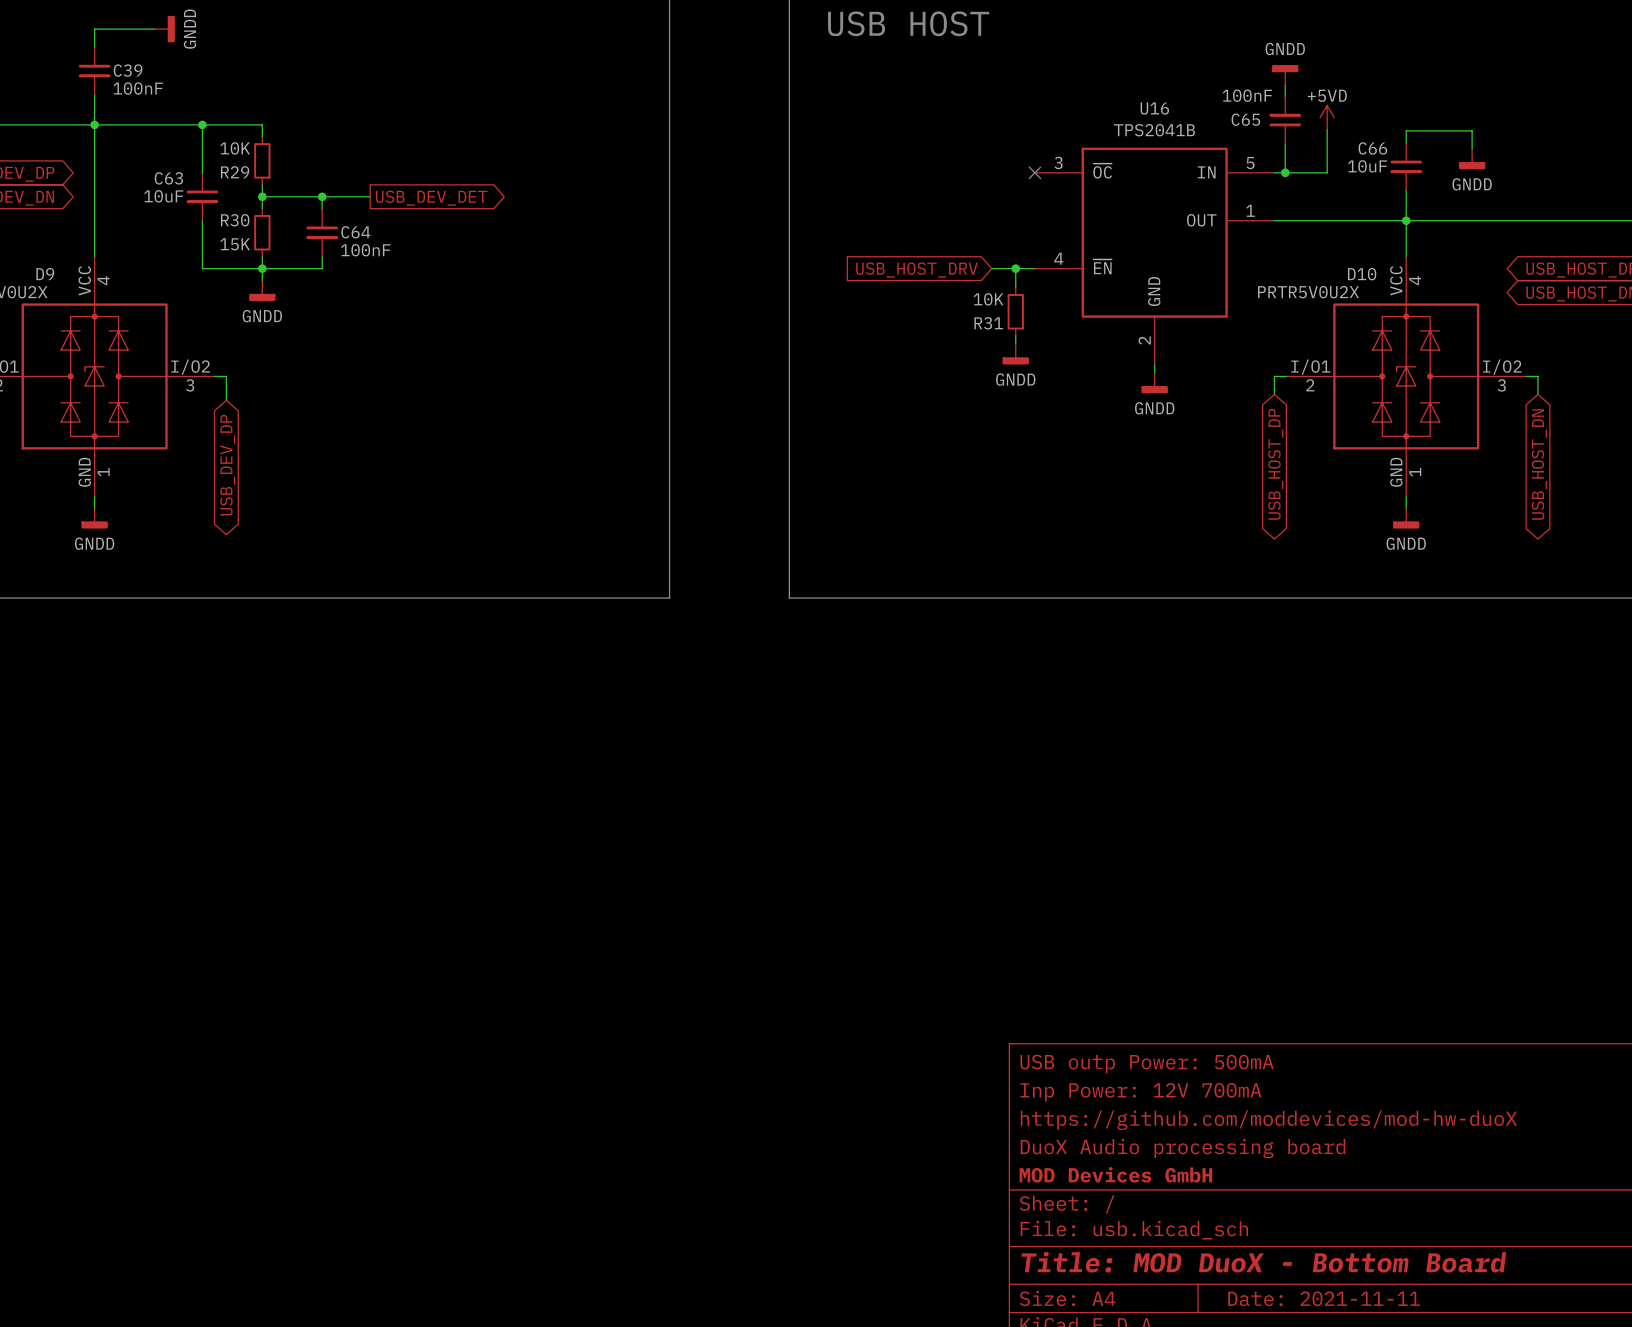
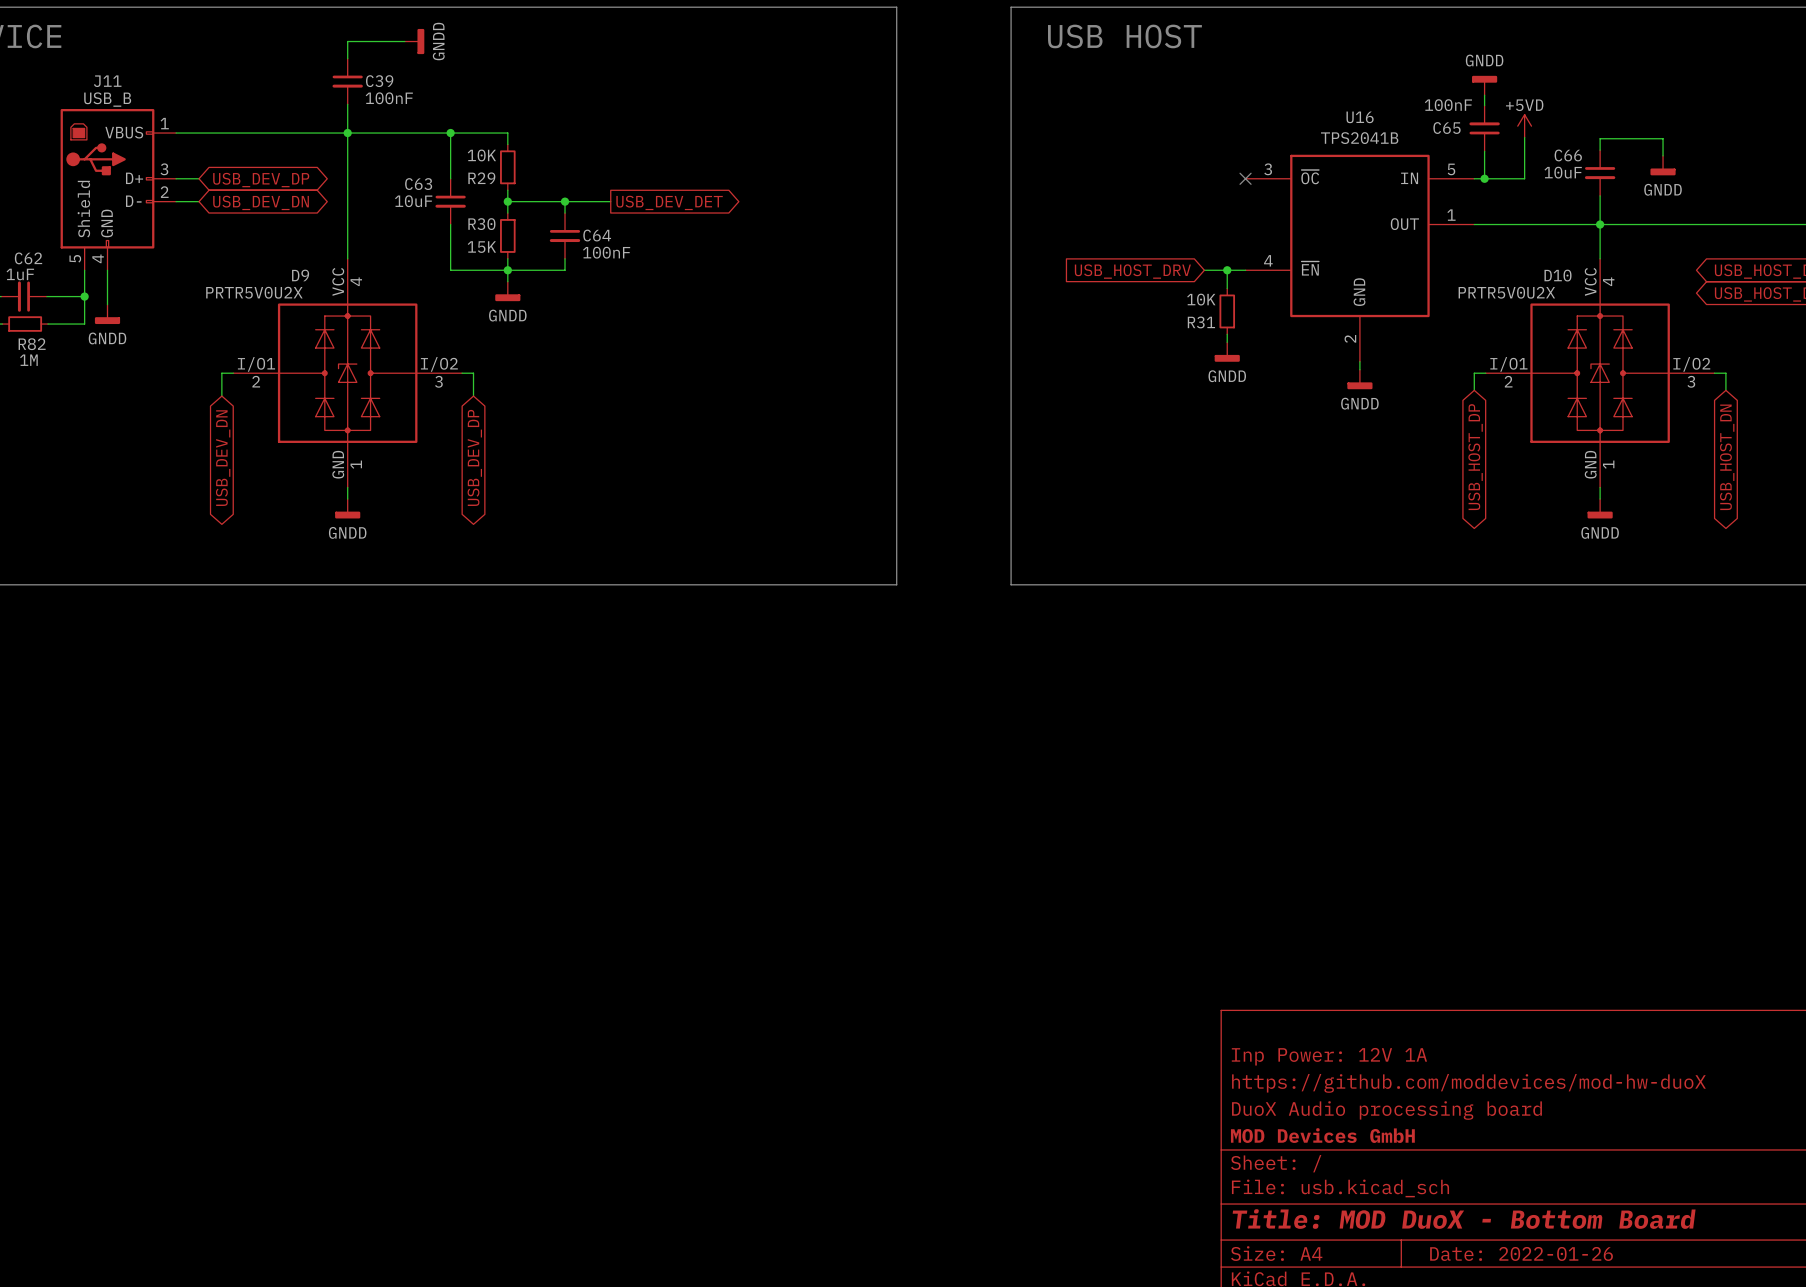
title block: USB outp Power: 500mA (1147, 1063) -> none
title block: Inp Power: 12V 700mA (1140, 1092) -> Inp Power: 12V 1A (1329, 1056)
title block: Date: 2021-11-11 (1324, 1298) -> Date: 2022-01-26 (1521, 1253)

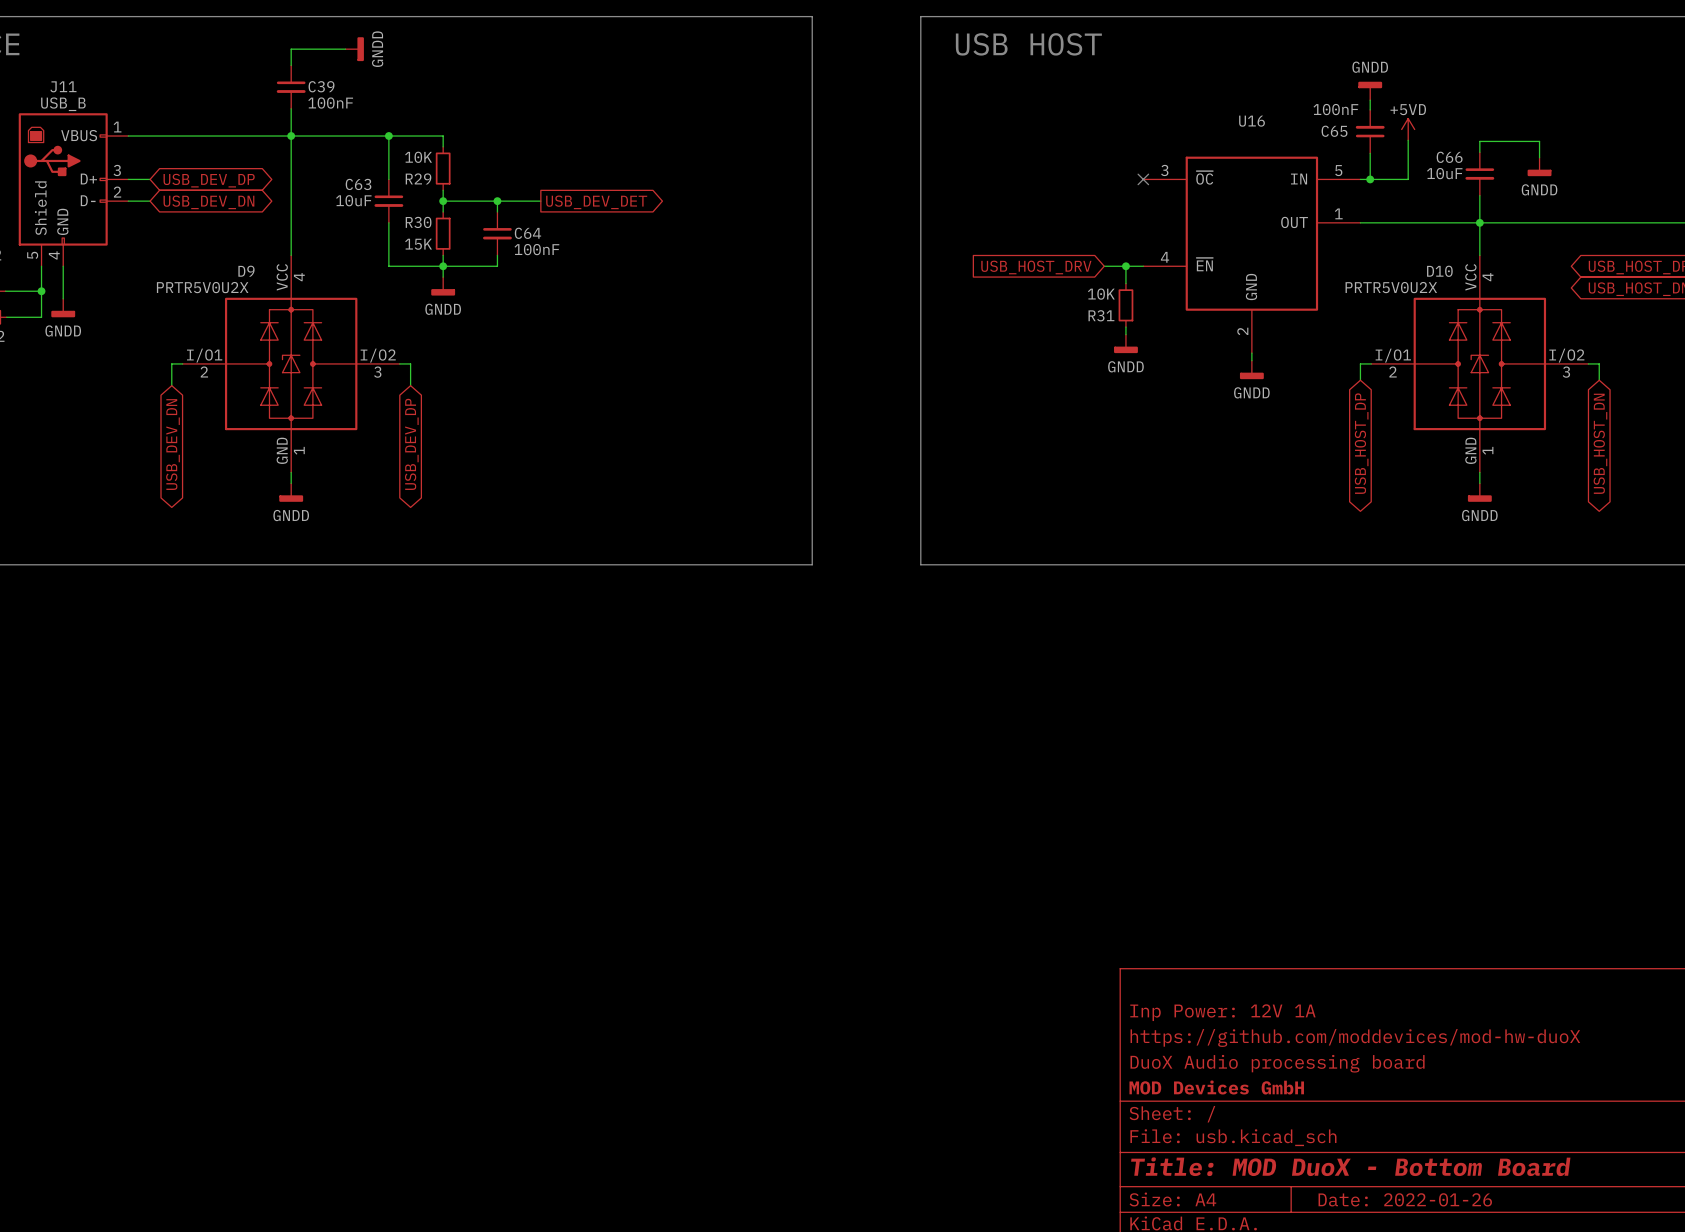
U16 value: TPS2041B (1359, 138) -> none

